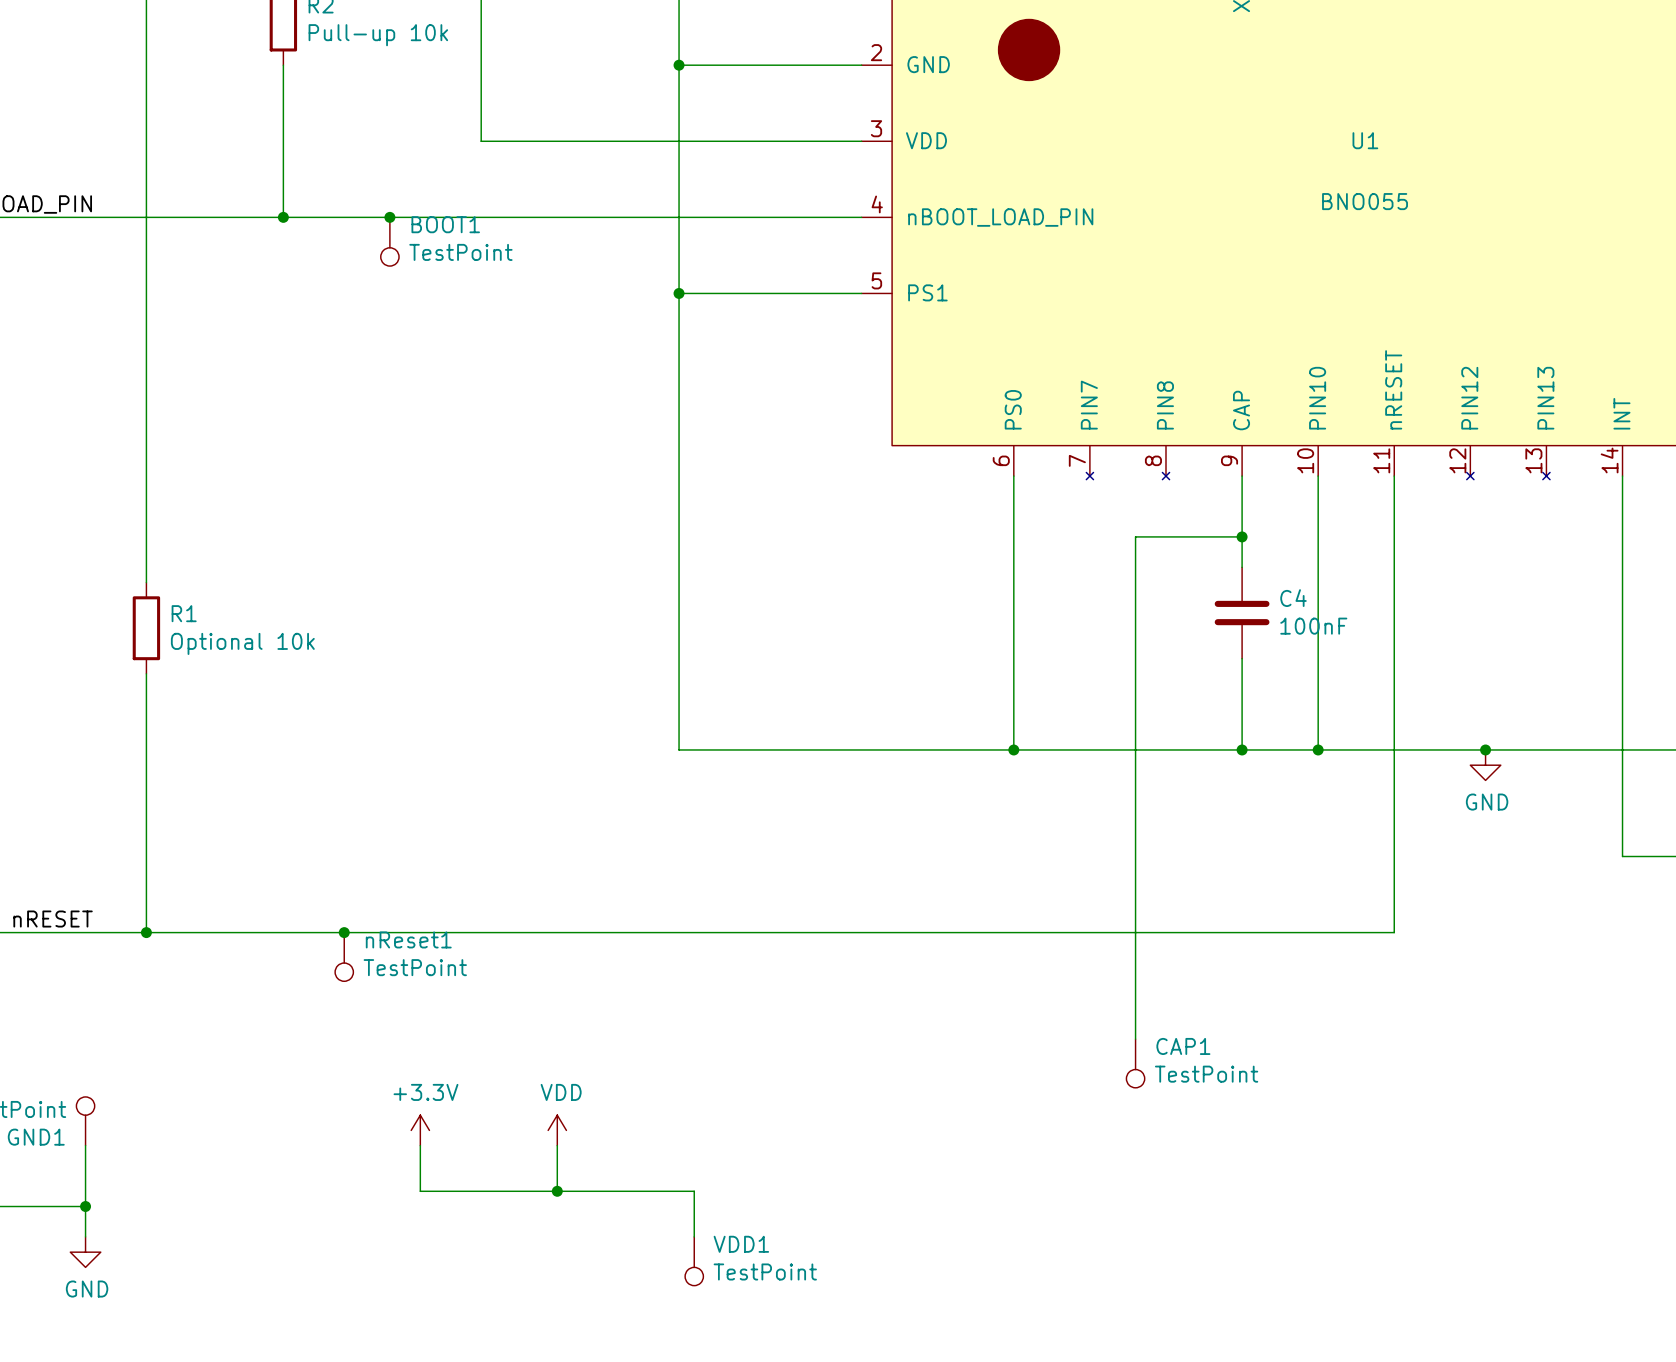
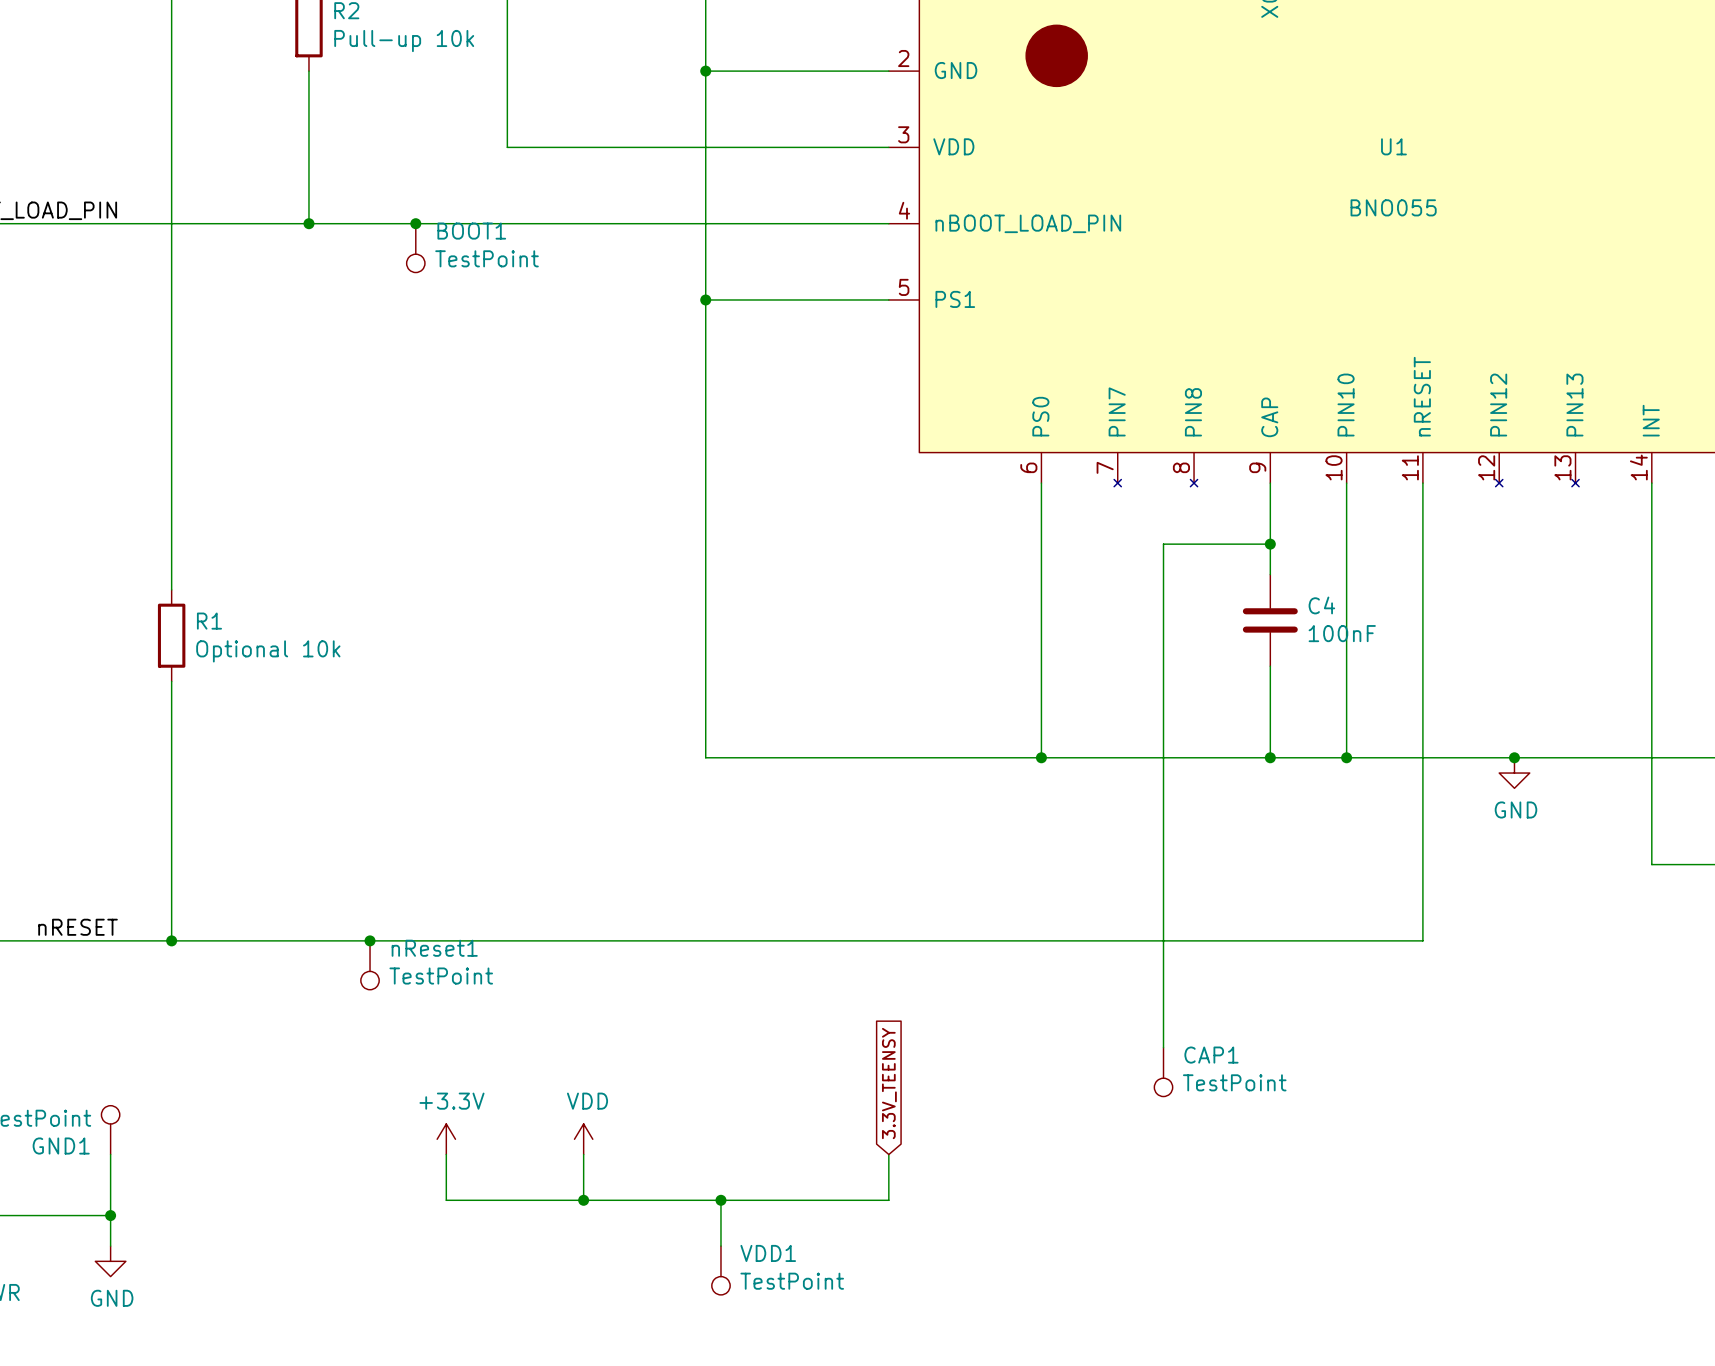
global label: none -> 3.3V_TEENSY (889, 1083)
wire: none -> (888, 1154) (888, 1200) (720, 1200)
junction: none -> (720, 1200)

